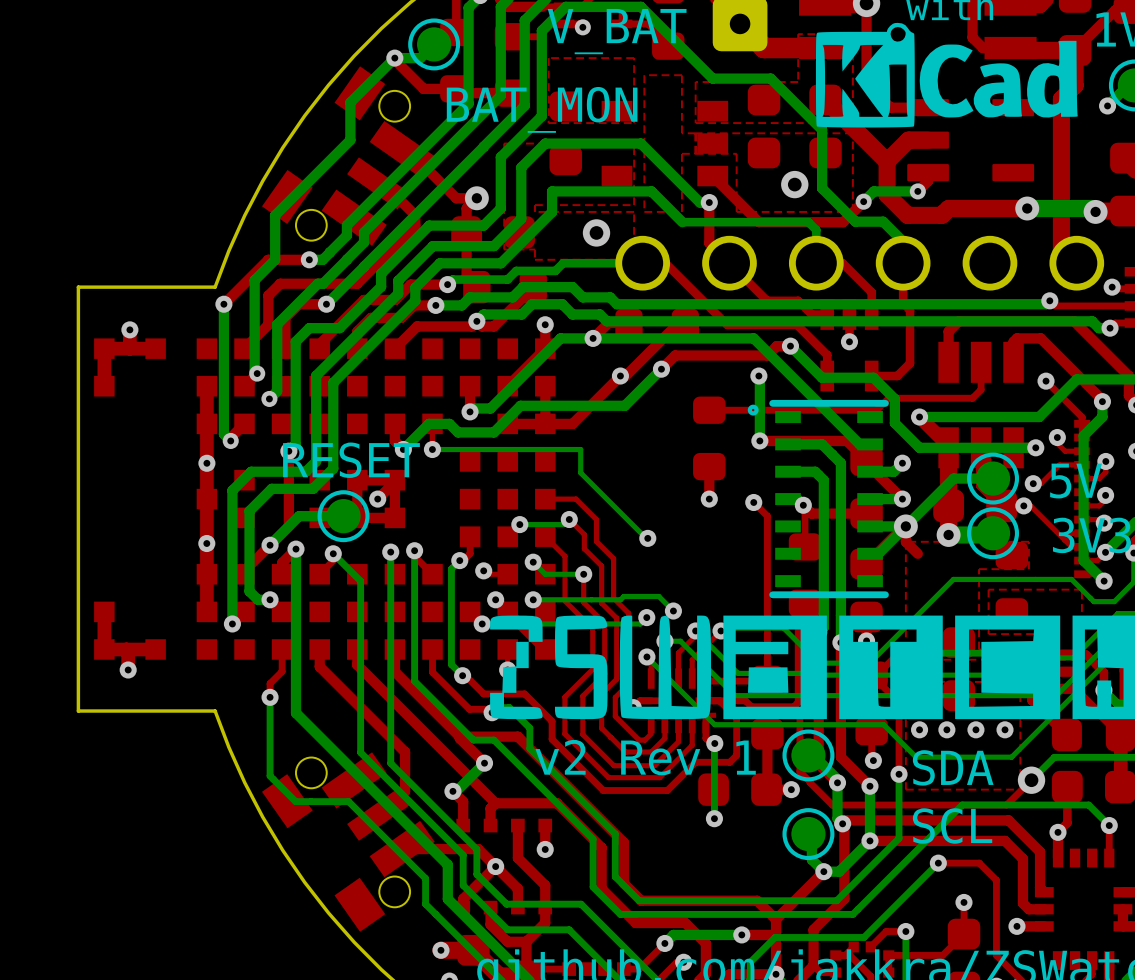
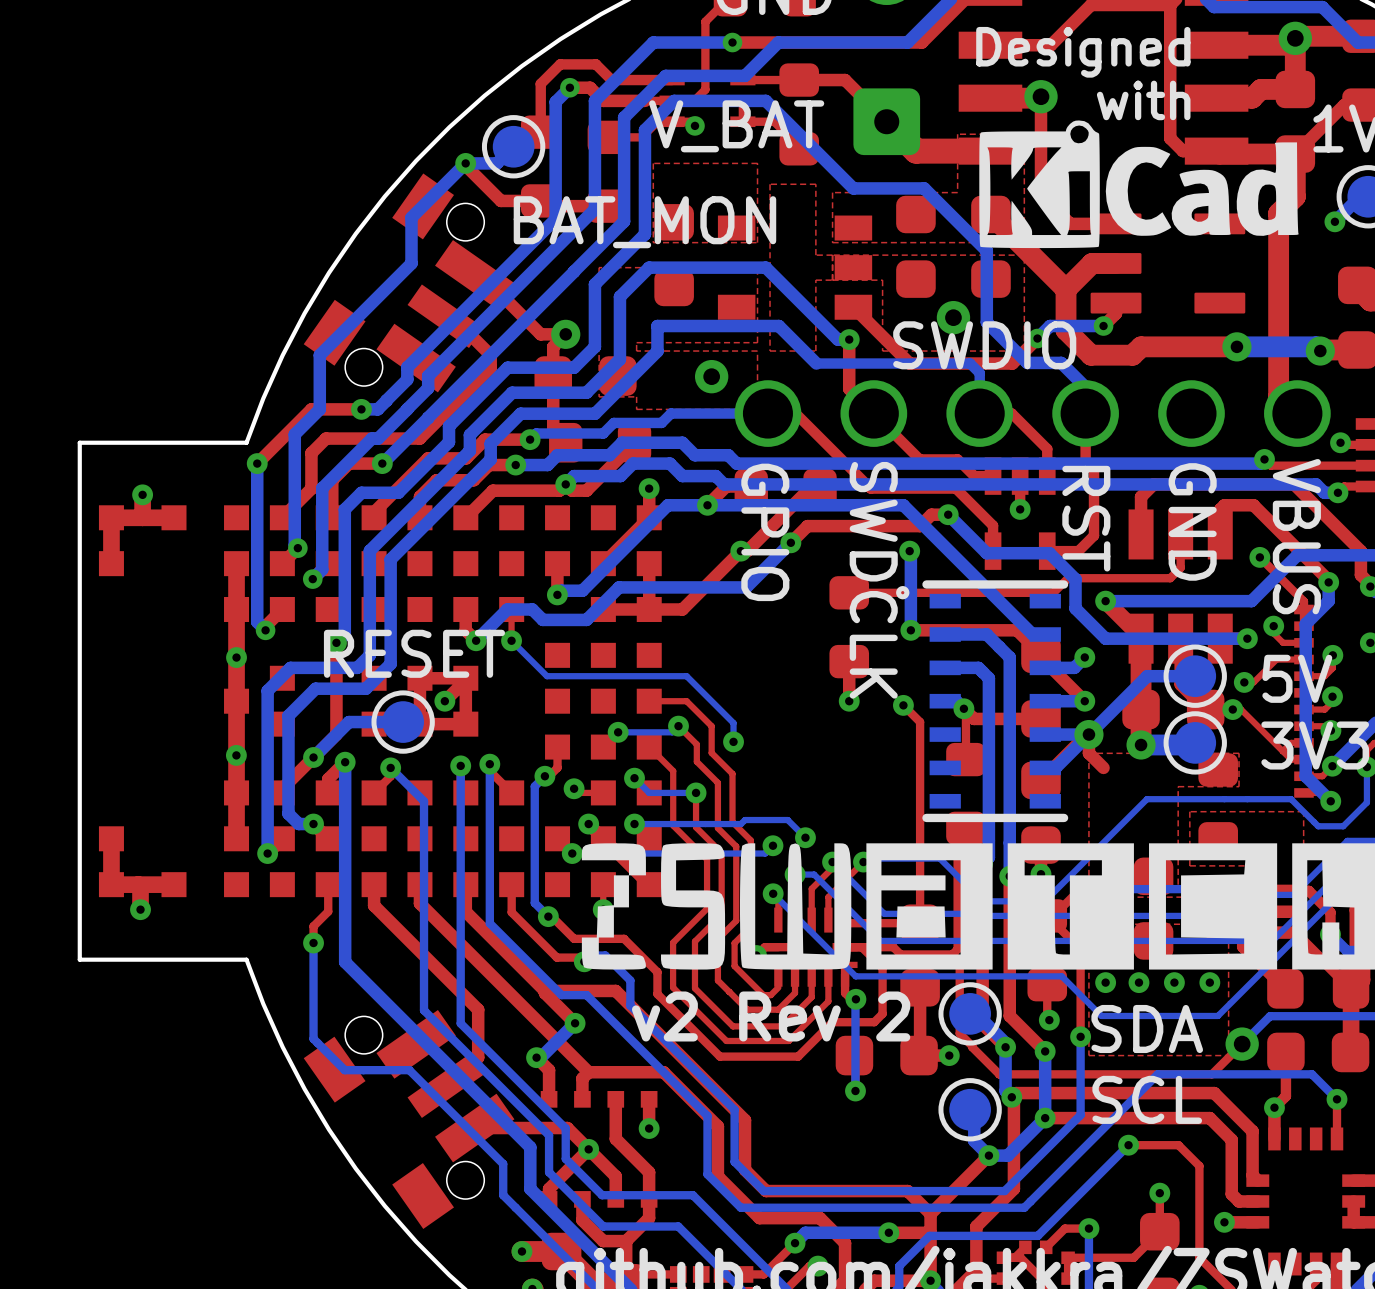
text: none -> SWDIO (984, 345)
text: none -> RST (1086, 518)
text: none -> GND (1192, 521)
text: none -> GPIO (765, 532)
text: none -> VBUS (1296, 536)
text: none -> SWDCLK (873, 580)
bottom track: (432, 449) (580, 449) (580, 472) (647, 538) -> (511, 640) (546, 676) (686, 676) (733, 723) (733, 741)
via position: (647, 538) -> (733, 741)
text: v2 Rev 1 (645, 757) -> v2 Rev 2 (771, 1016)

